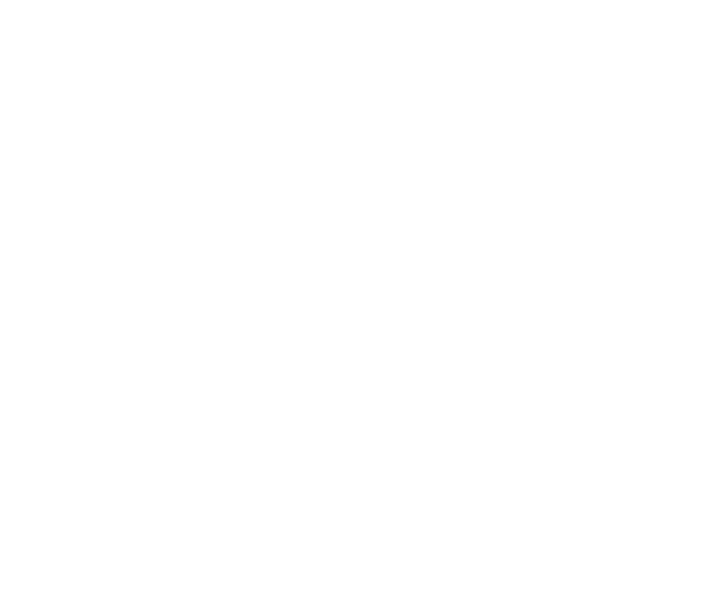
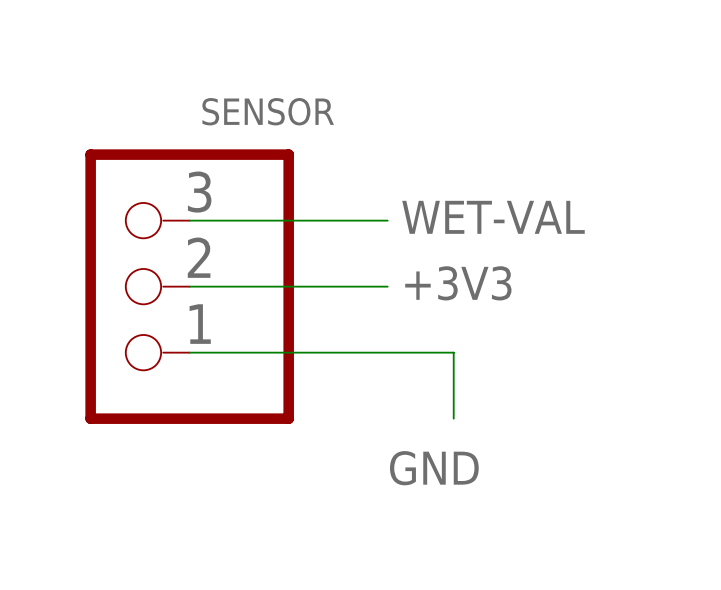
label: none -> WET-VAL (493, 217)
wire: none -> (189, 220) (387, 220)
label: none -> +3V3 (458, 283)
wire: none -> (189, 286) (387, 286)
SENSOR: none -> (189, 286)
wire: none -> (189, 352) (453, 352) (453, 418)
label: none -> GND (434, 468)

